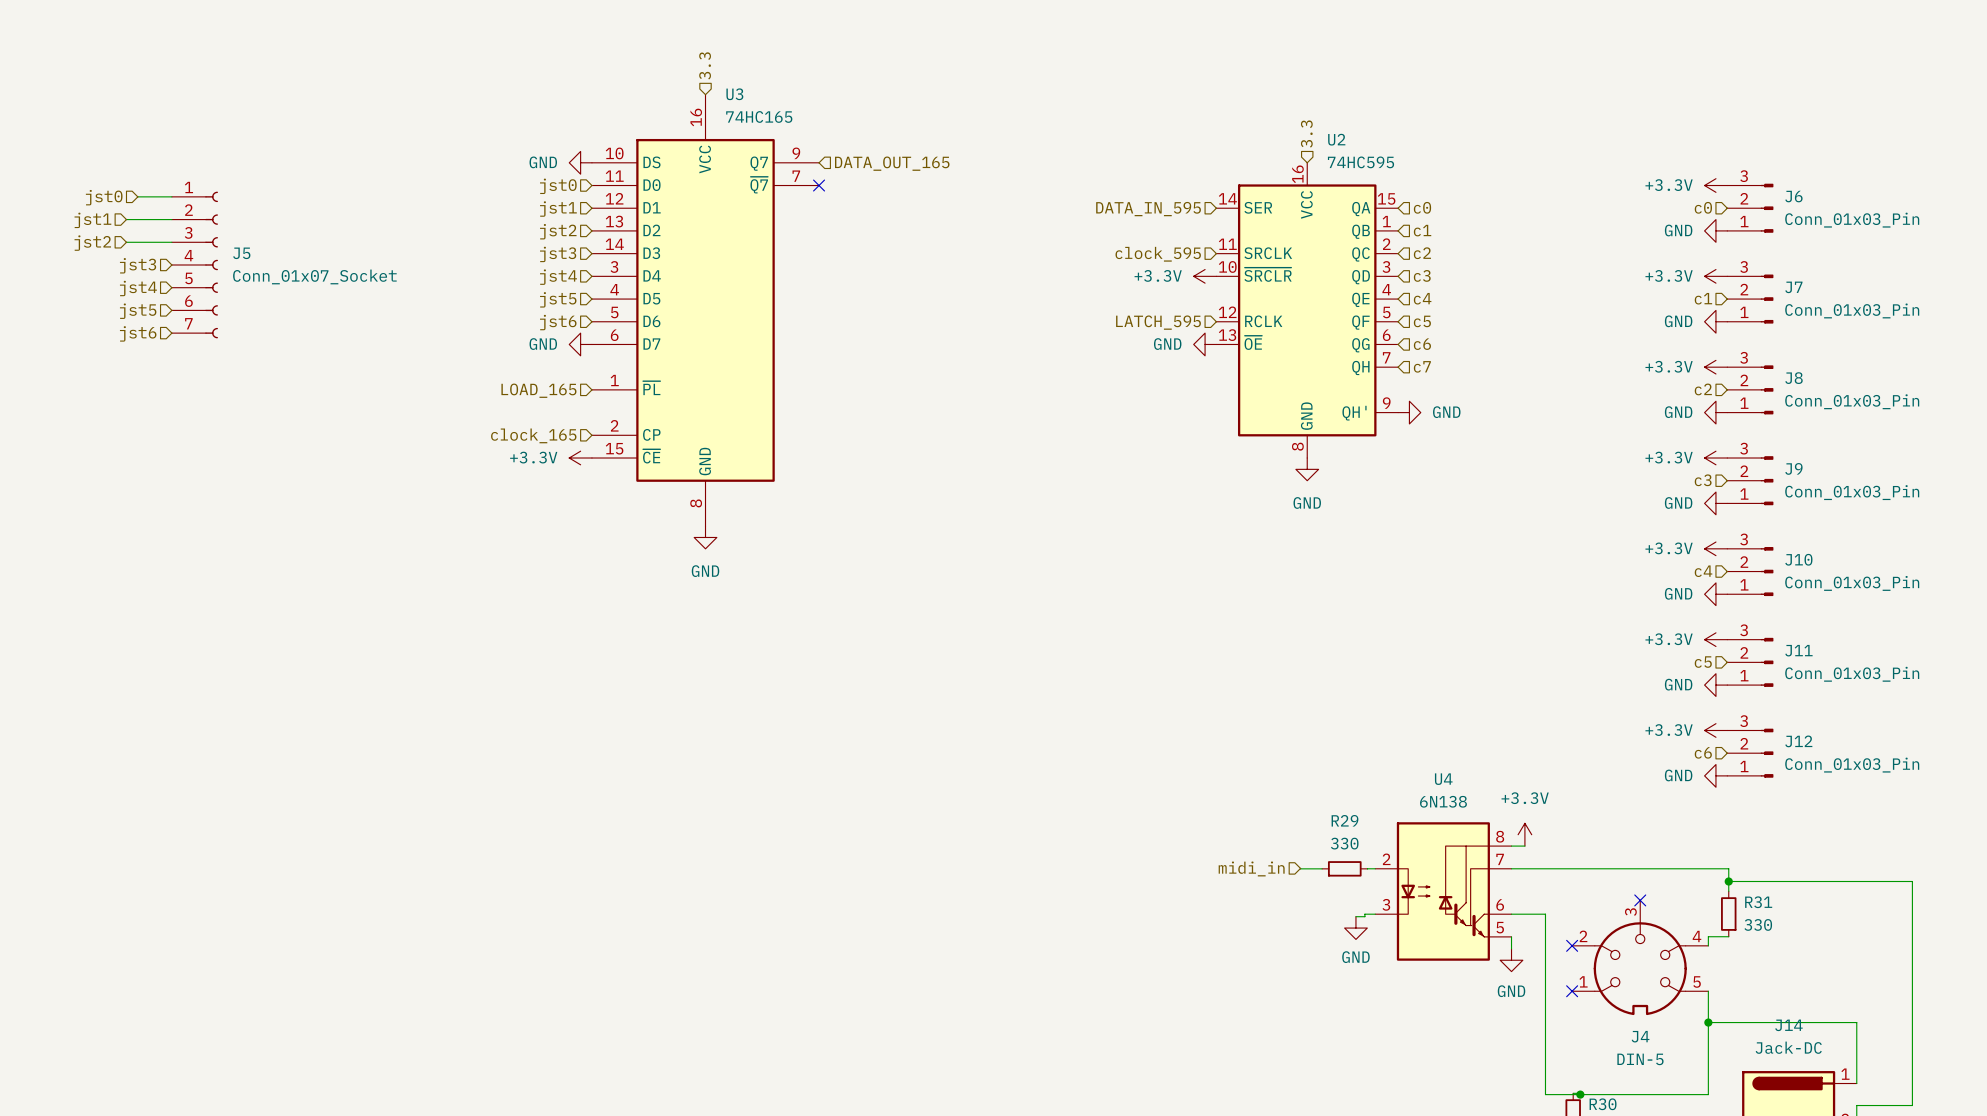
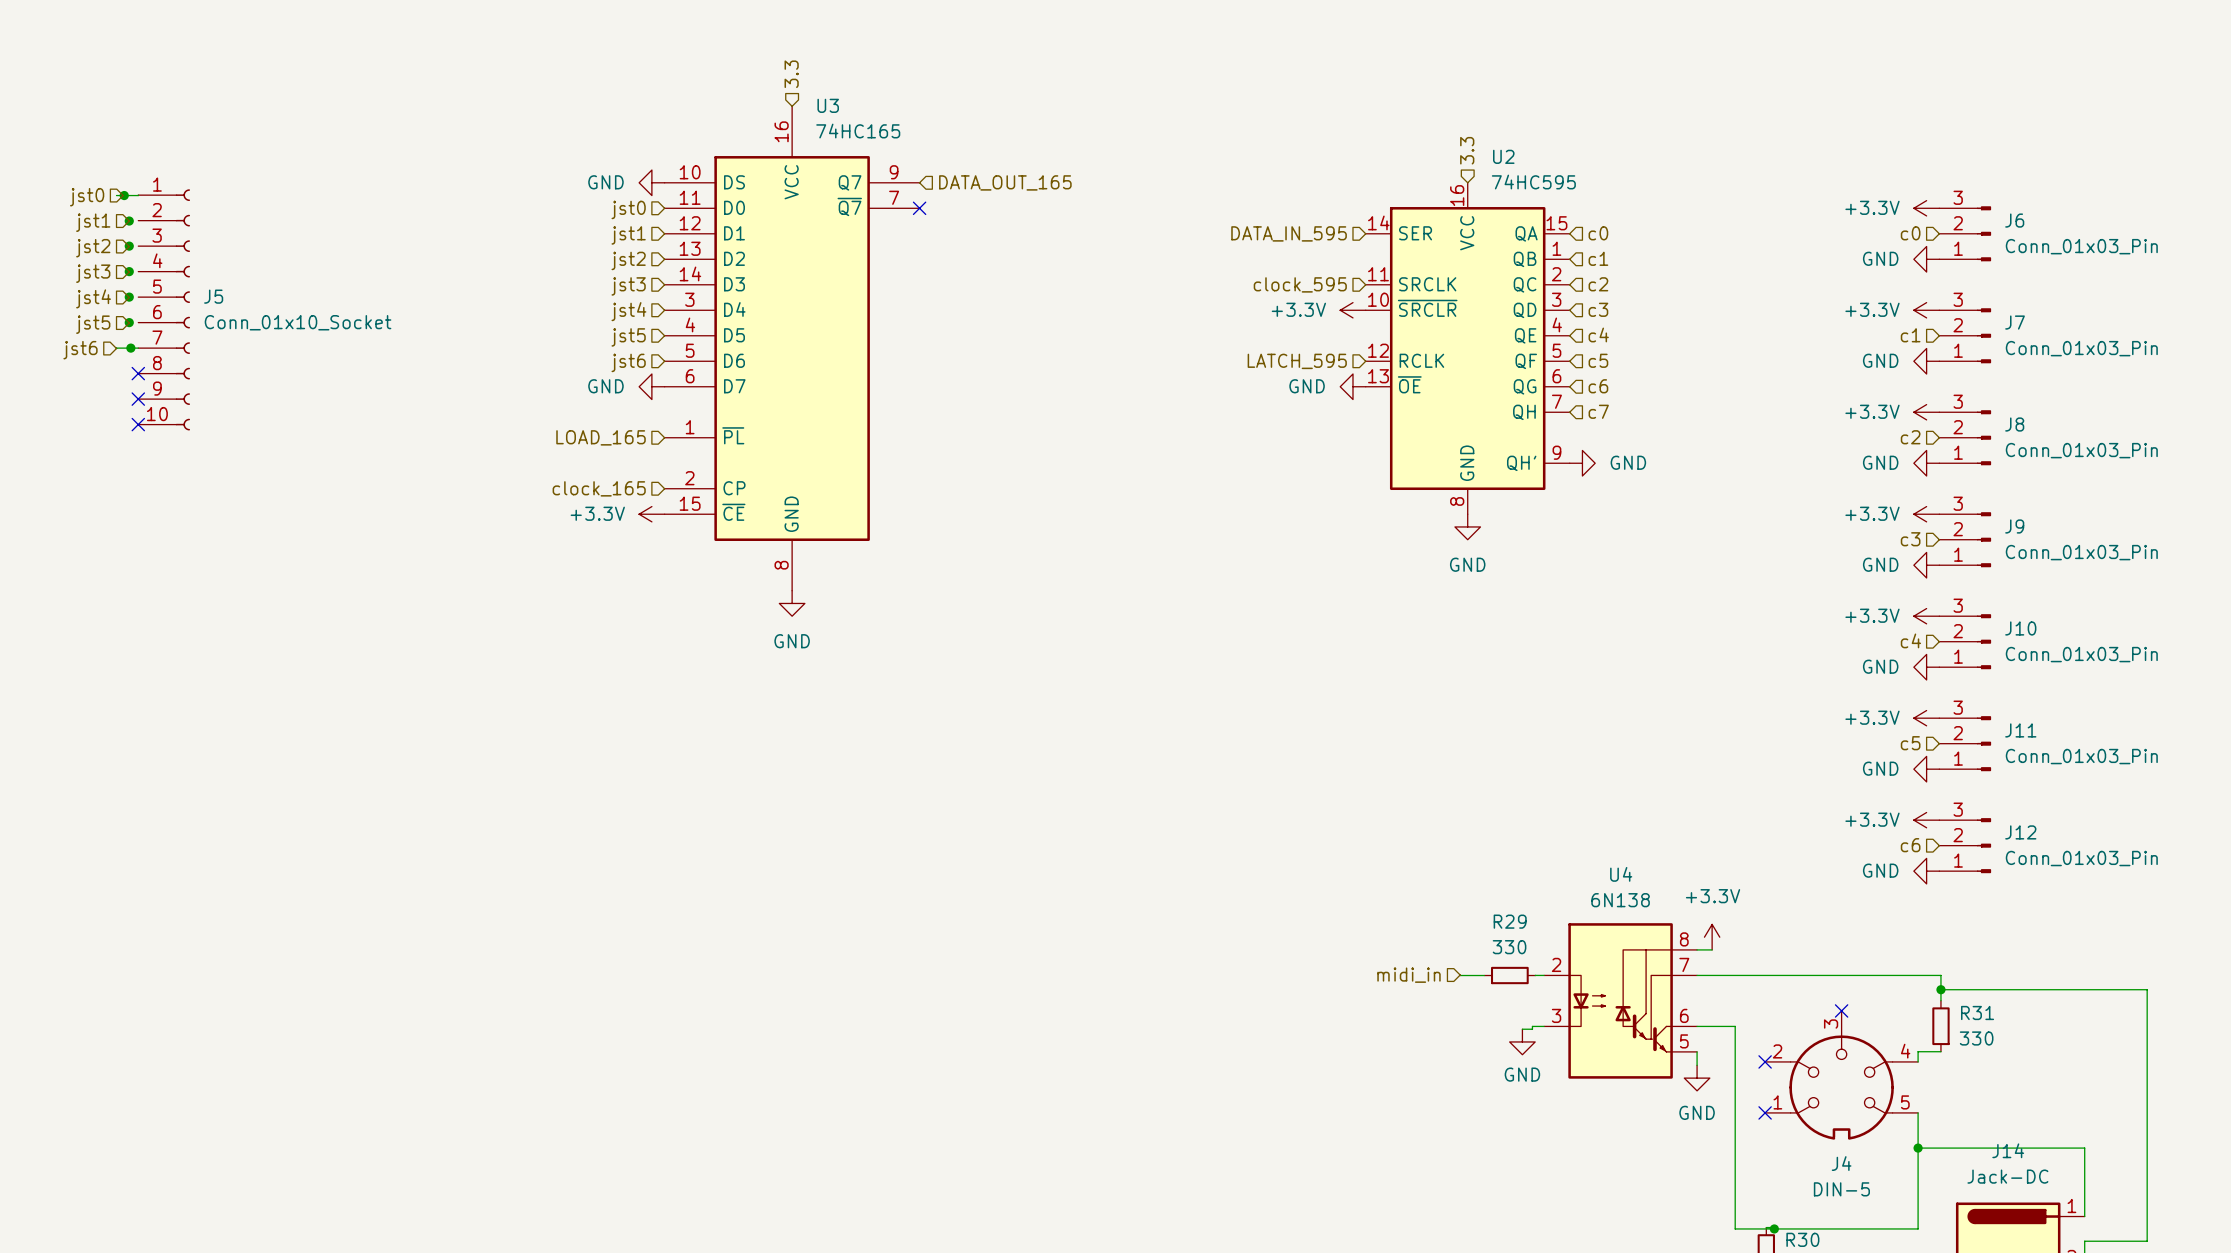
wire: none -> (138, 195) (116, 195)
junction: none -> (124, 195)
J5 symbol: [171, 191, 218, 339] -> [138, 189, 191, 431]
junction: none -> (129, 221)
hierarchical label position: jst0 (104, 197) -> jst0 (87, 197)
junction: none -> (129, 246)
hierarchical label position: jst1 (92, 220) -> jst1 (93, 222)
junction: none -> (129, 271)
hierarchical label position: jst2 (92, 243) -> jst2 (93, 248)
junction: none -> (129, 297)
hierarchical label position: jst3 (138, 265) -> jst3 (93, 273)
J5 value: Conn_01x07_Socket (314, 276) -> Conn_01x10_Socket (298, 322)
junction: none -> (129, 322)
hierarchical label position: jst4 (138, 288) -> jst4 (93, 298)
junction: none -> (130, 348)
wire: none -> (138, 348) (116, 348)
hierarchical label position: jst5 (138, 311) -> jst5 (93, 324)
no-connect mark: none -> (138, 373)
hierarchical label position: jst6 (138, 333) -> jst6 (80, 350)
no-connect mark: none -> (138, 399)
no-connect mark: none -> (138, 424)

